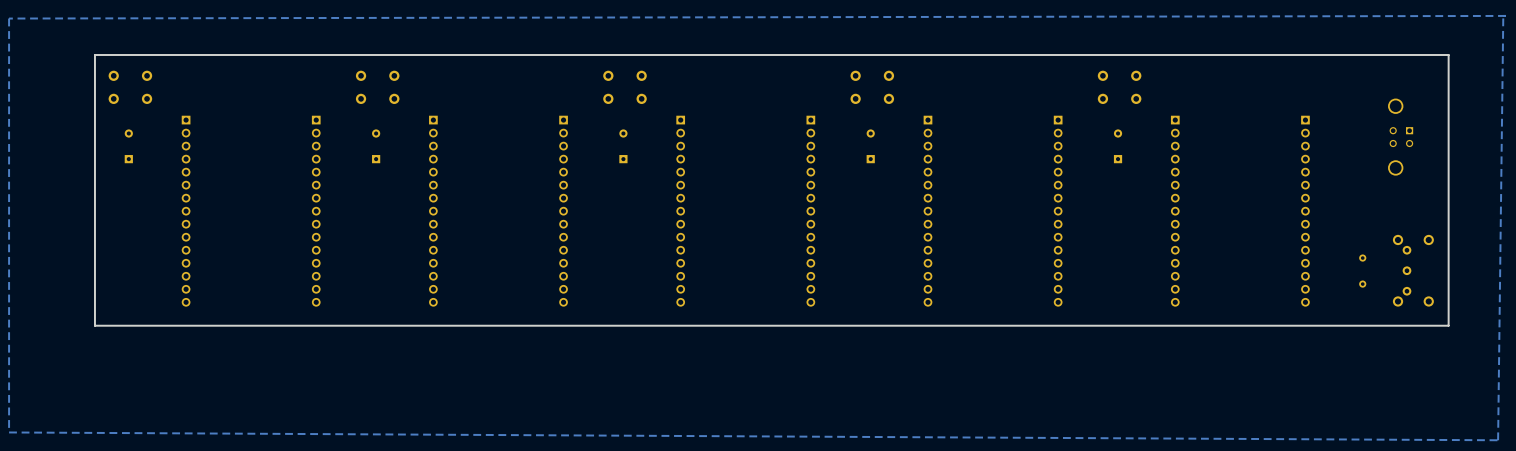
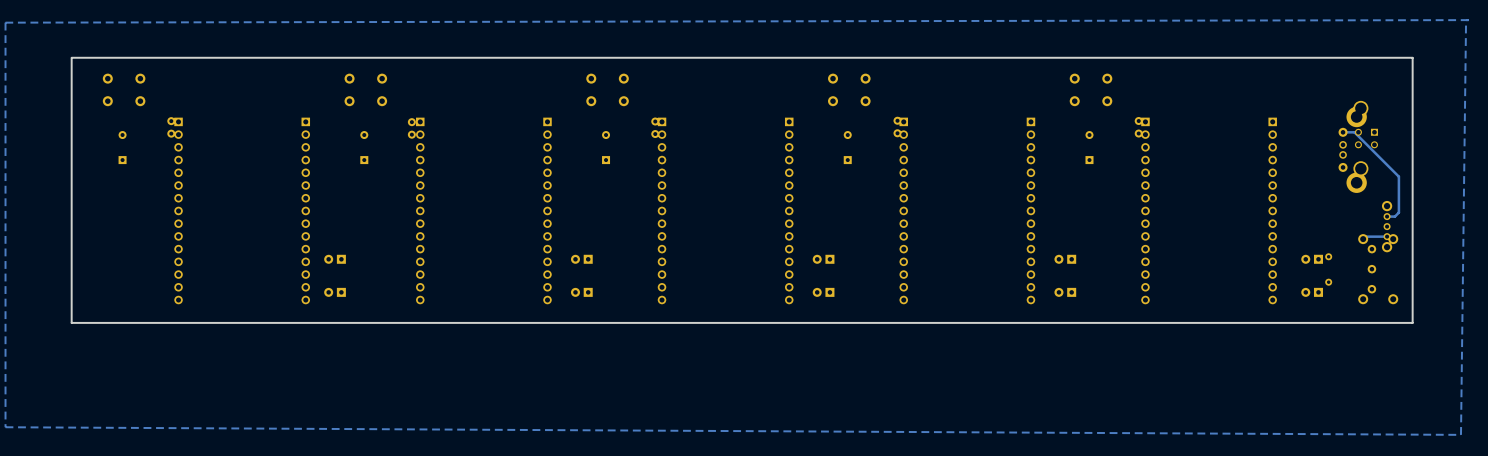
board edge: (1448, 54) (94, 54) (94, 325) -> (71, 58) (71, 322) (89, 322)
board edge: none -> (1412, 57) (71, 57)
part: none -> (171, 127)
part: none -> (897, 127)
part: none -> (1138, 127)
part: none -> (411, 128)
part: none -> (655, 127)
track: none -> (1343, 132) (1354, 132) (1398, 176) (1398, 212) (1394, 216) (1387, 216)
part: none -> (1352, 149)
part: none -> (1387, 226)
track: none -> (1387, 236) (1361, 236)
part: none -> (335, 259)
part: none -> (581, 259)
part: none -> (823, 259)
part: none -> (1065, 259)
part: none -> (1312, 259)
part: none -> (335, 292)
part: none -> (581, 292)
part: none -> (823, 292)
part: none -> (1065, 292)
part: none -> (1312, 292)

